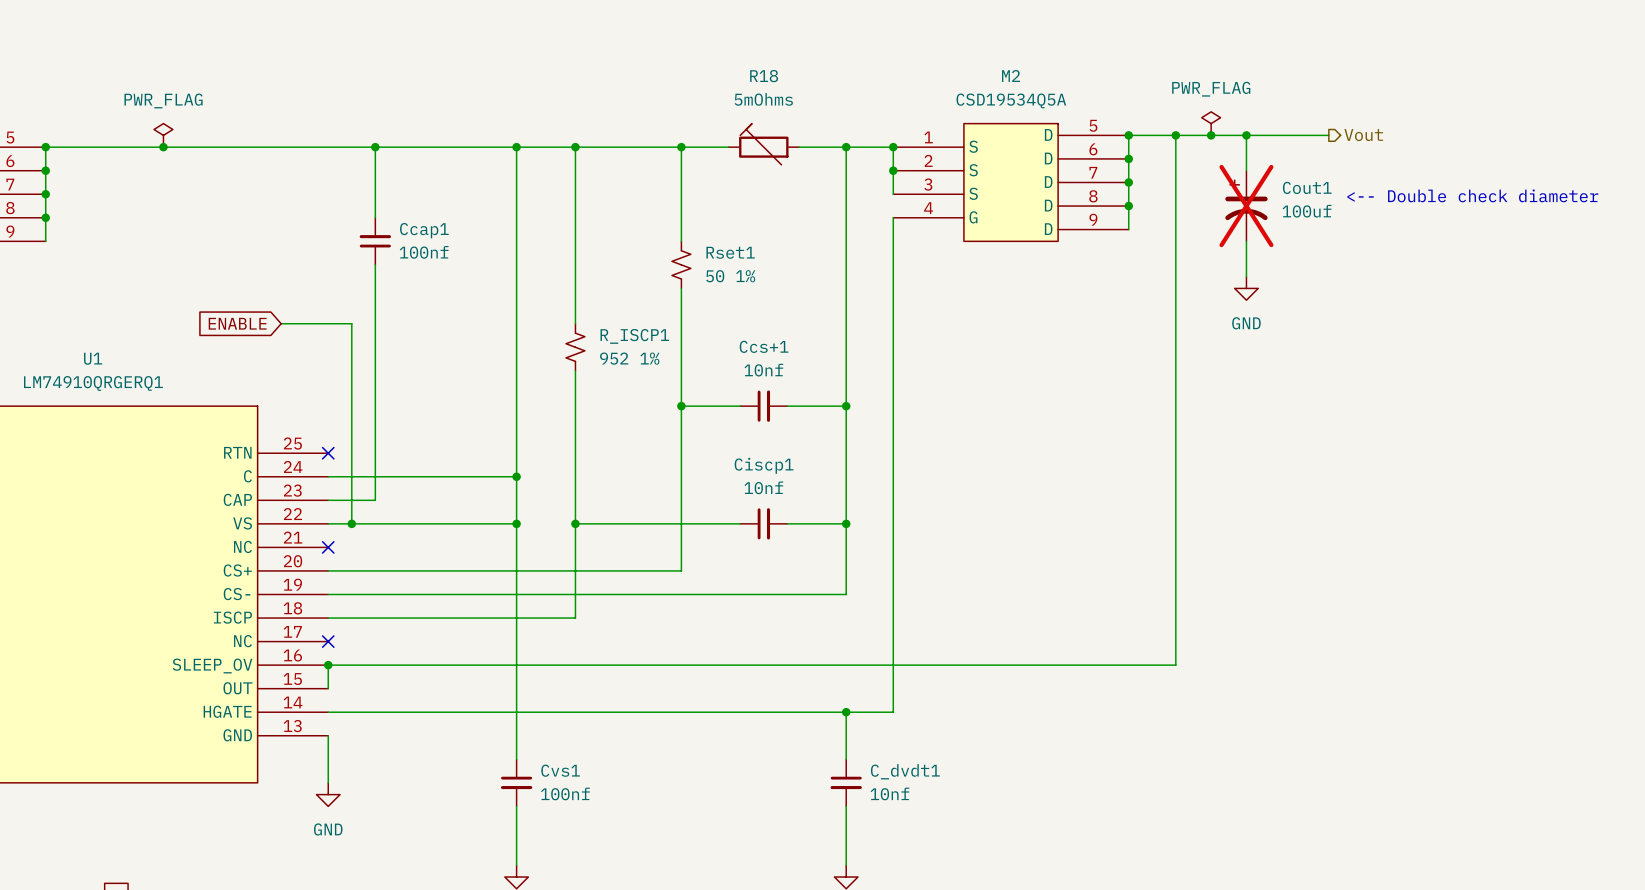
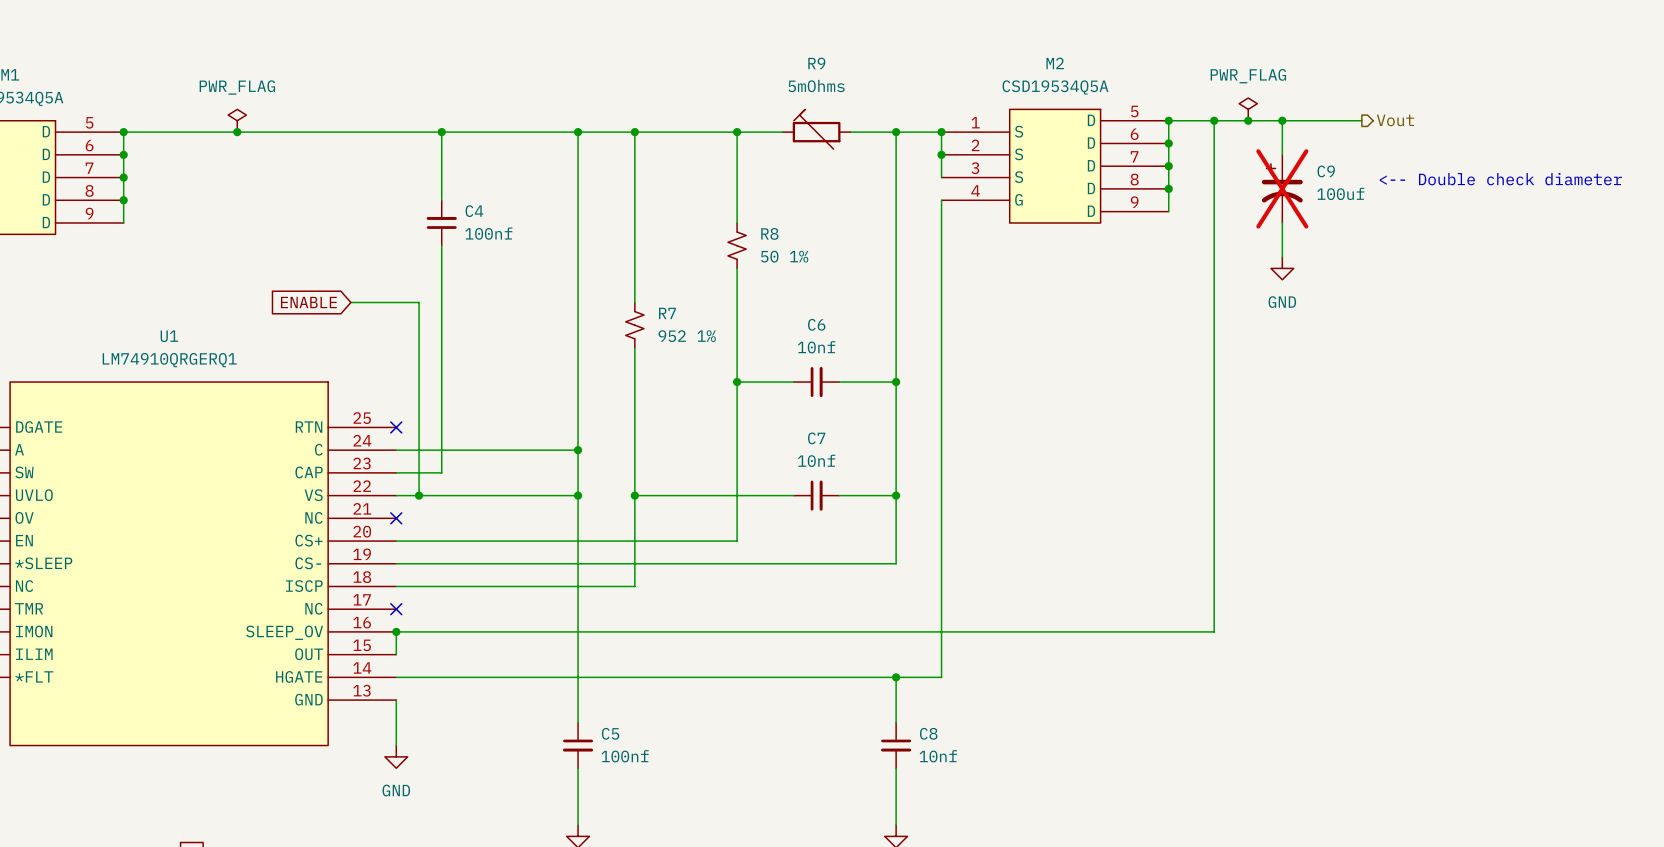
R18 name: R18 (764, 76) -> R9 (816, 63)
Cout1 name: Cout1 (1307, 187) -> C9 (1326, 171)
Ccap1 name: Ccap1 (424, 230) -> C4 (474, 211)
Rset1 name: Rset1 (730, 252) -> R8 (769, 233)
R_ISCP1 name: R_ISCP1 (634, 336) -> R7 (667, 313)
Ccs+1 name: Ccs+1 (764, 346) -> C6 (816, 324)
Ciscp1 name: Ciscp1 (764, 465) -> C7 (816, 438)
Cvs1 name: Cvs1 (560, 770) -> C5 (610, 733)
C_dvdt1 name: C_dvdt1 (905, 771) -> C8 (928, 733)

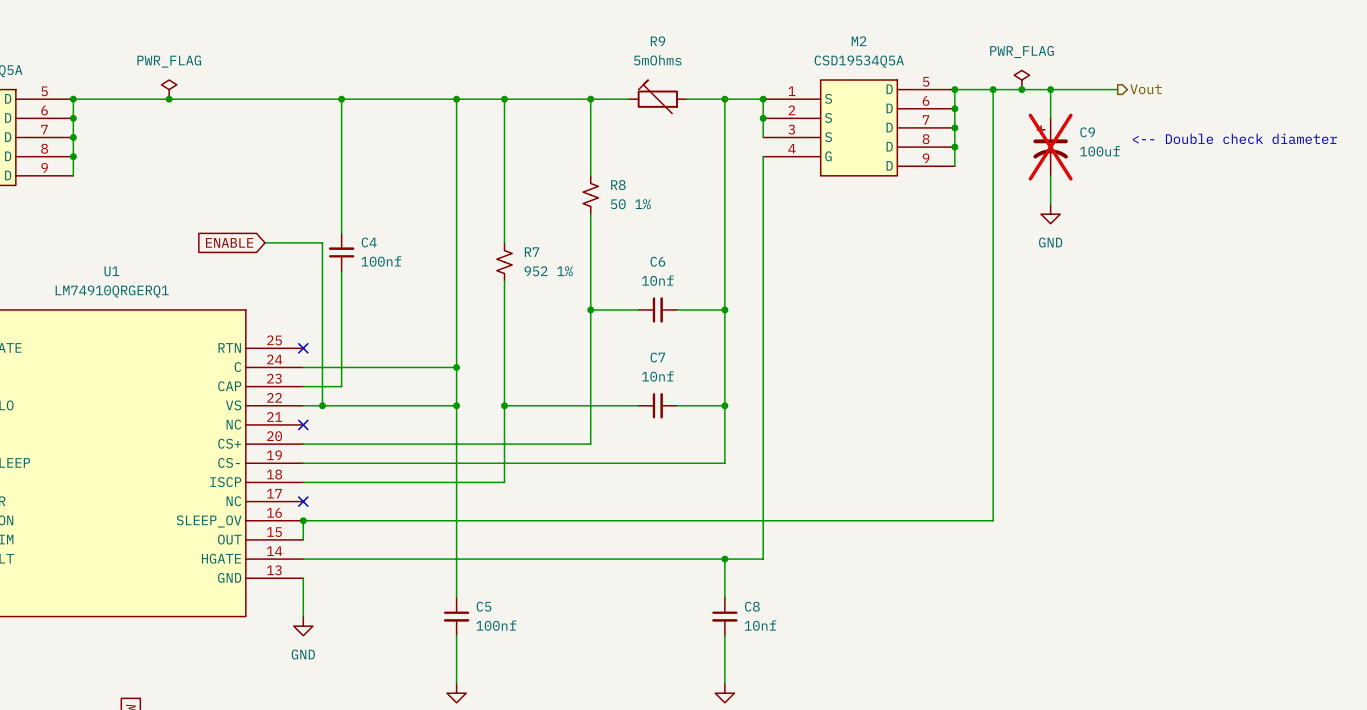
C4 position: (441, 222) -> (341, 252)

